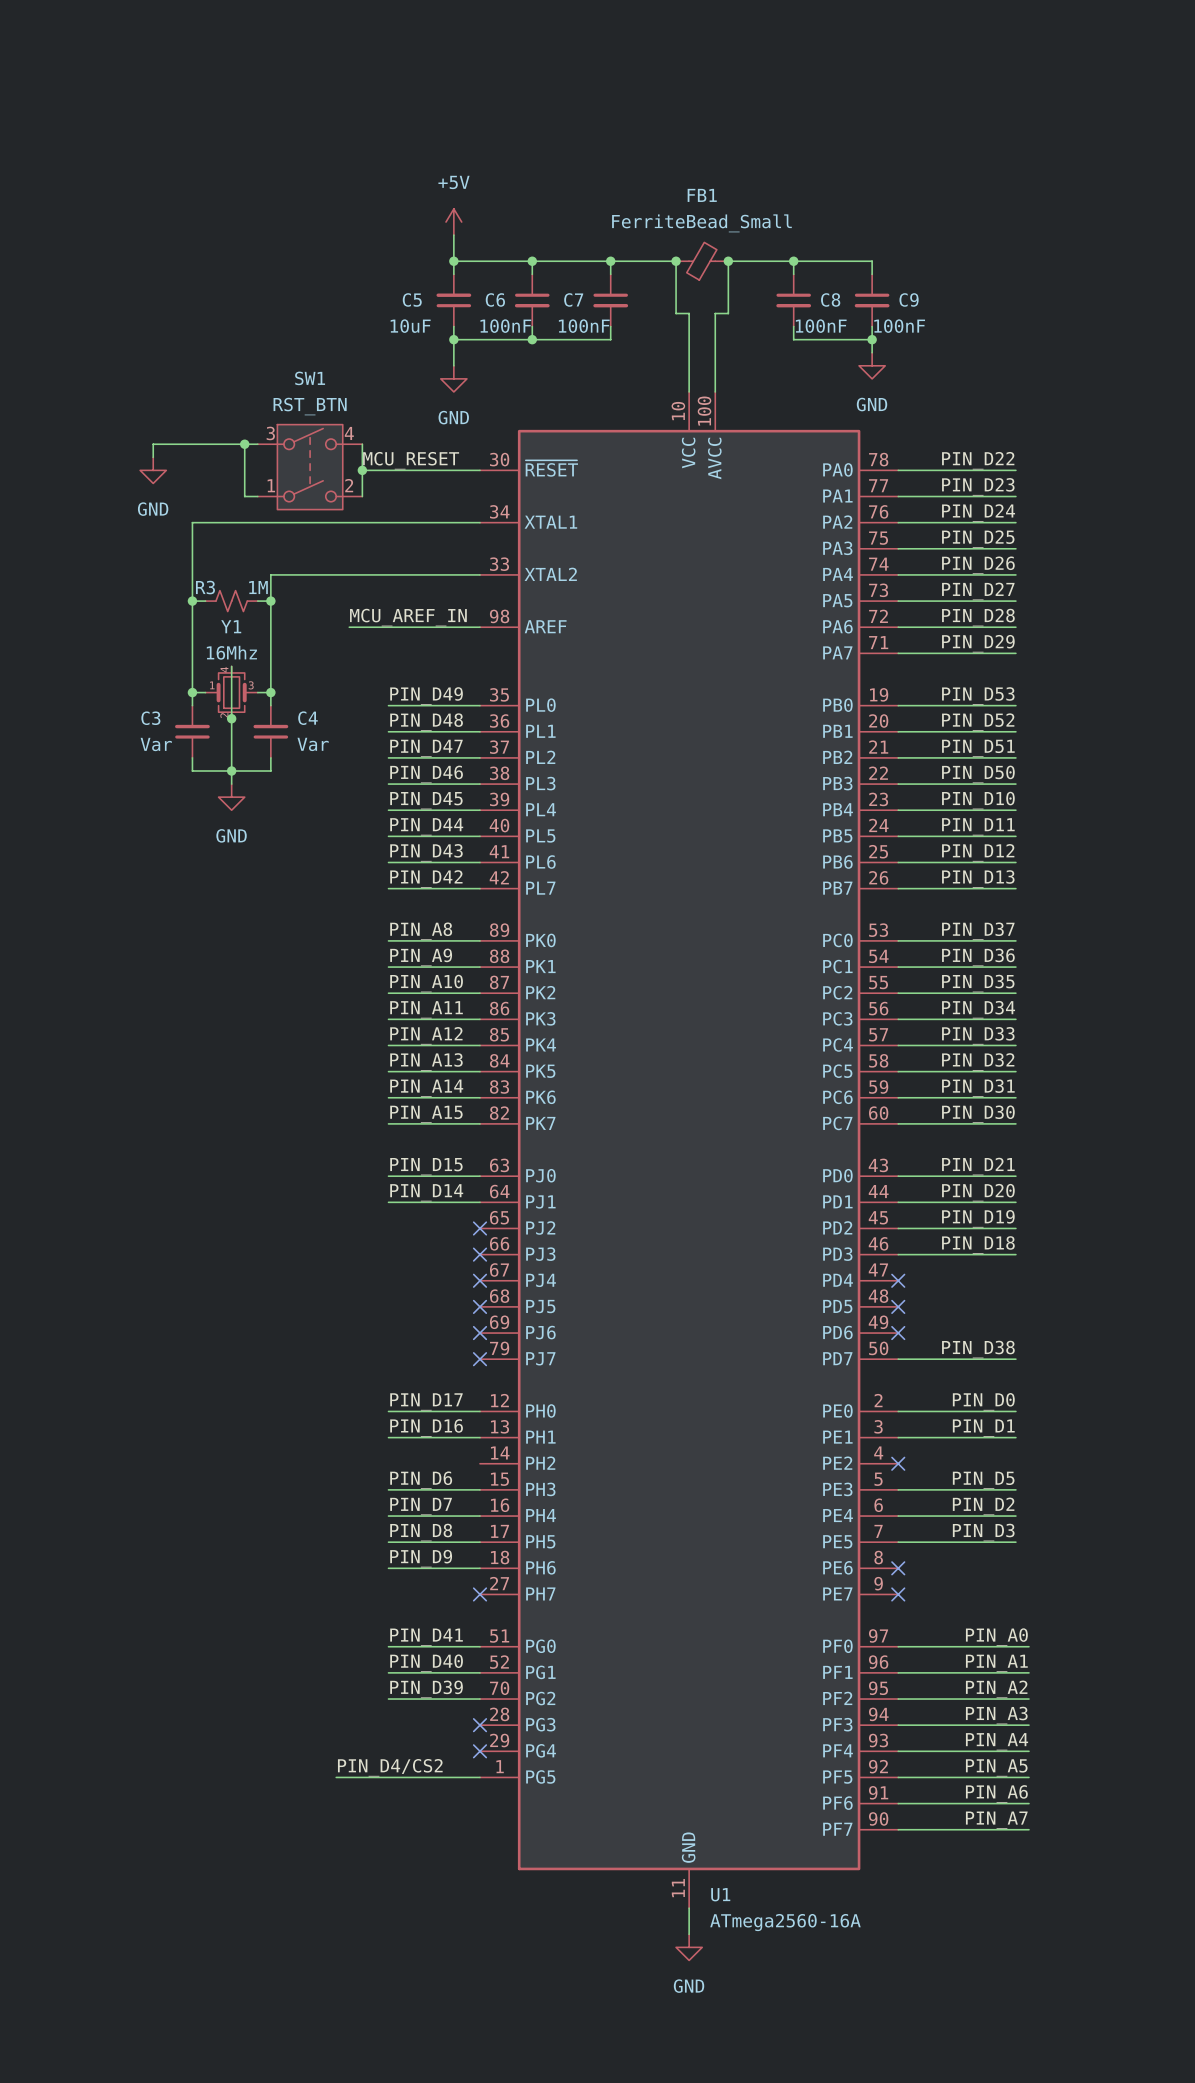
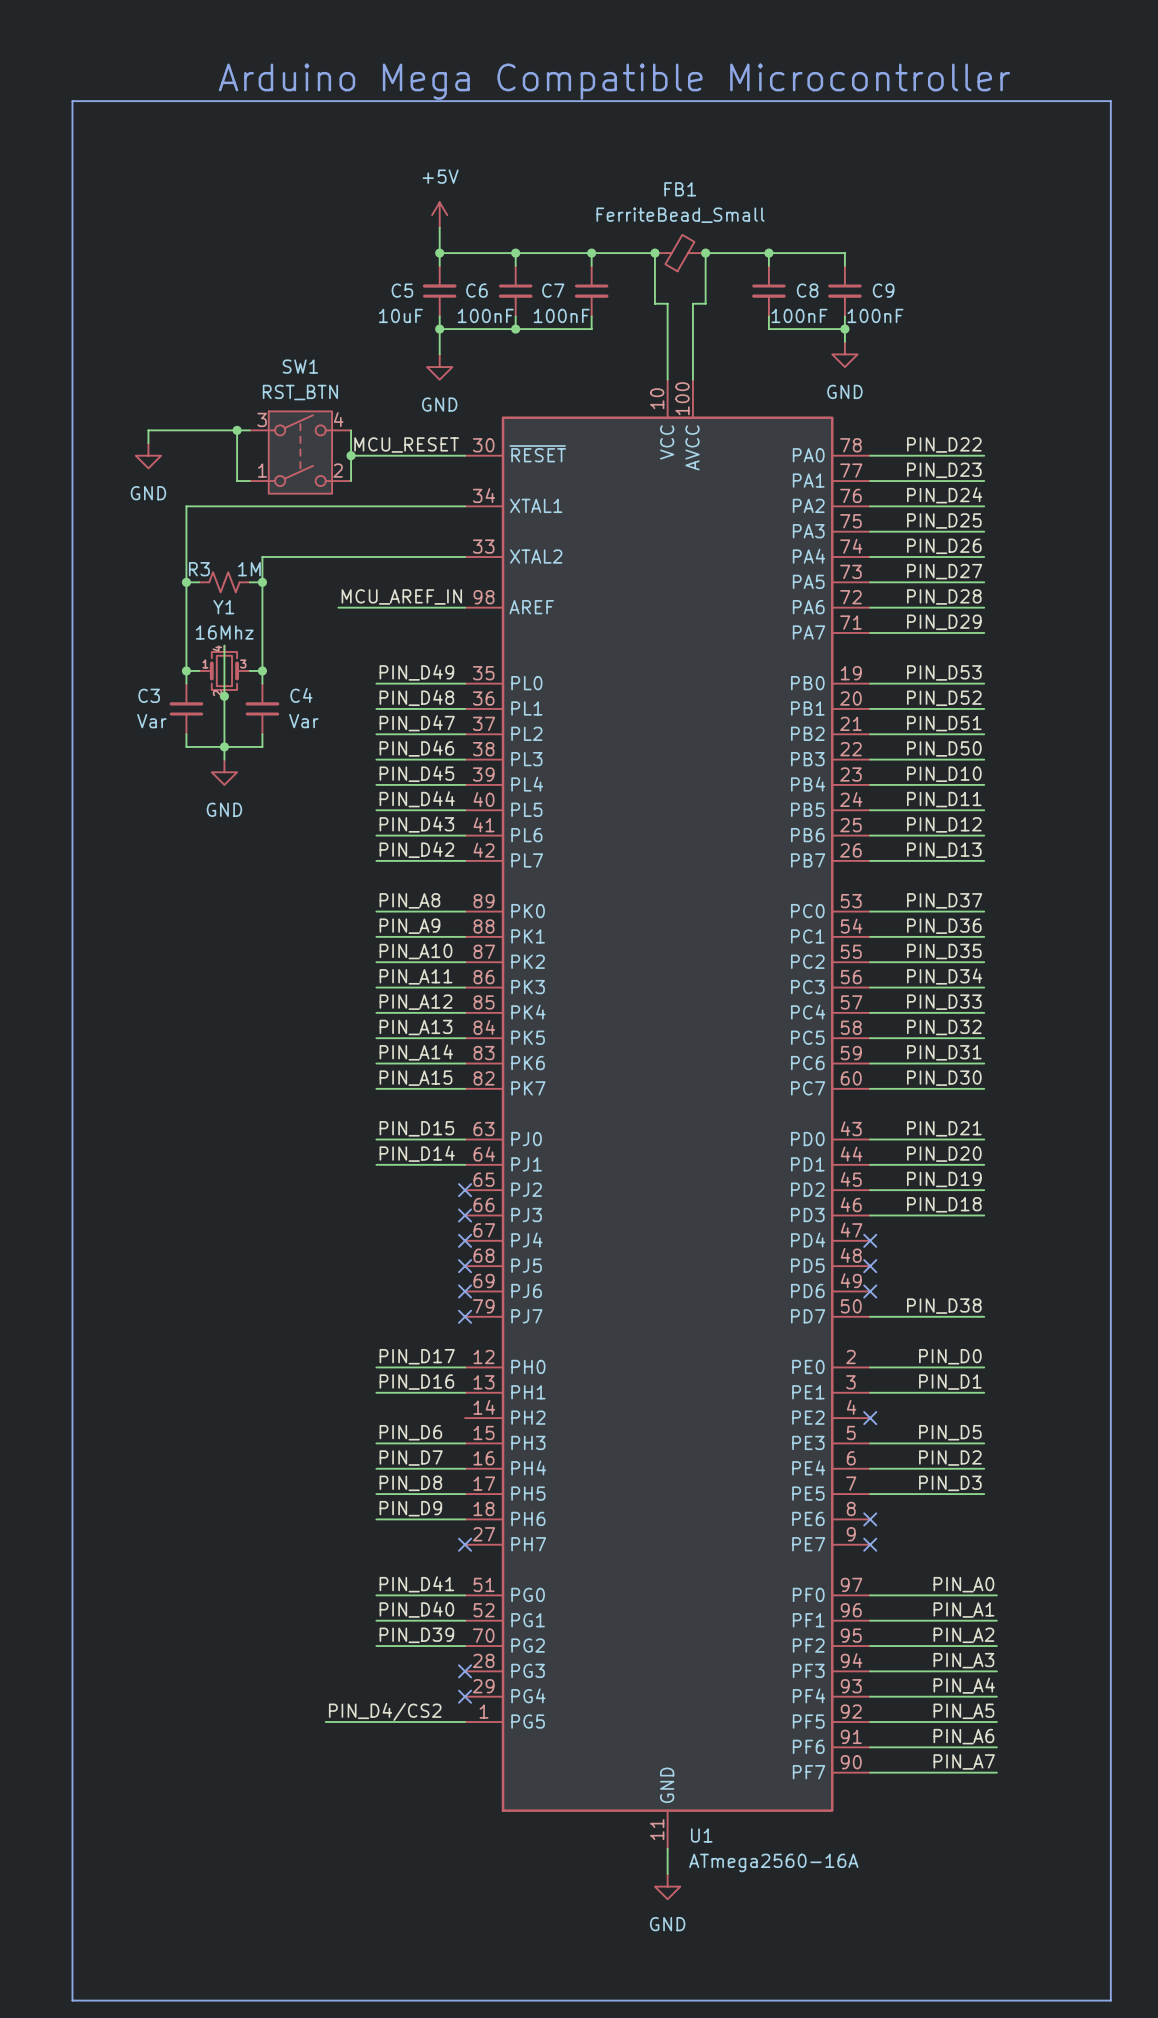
text: none -> Arduino Mega Compatible Microcontroller (614, 81)
line: none -> (72, 101) (1110, 101) (1110, 2000) (72, 2000) (72, 101)

